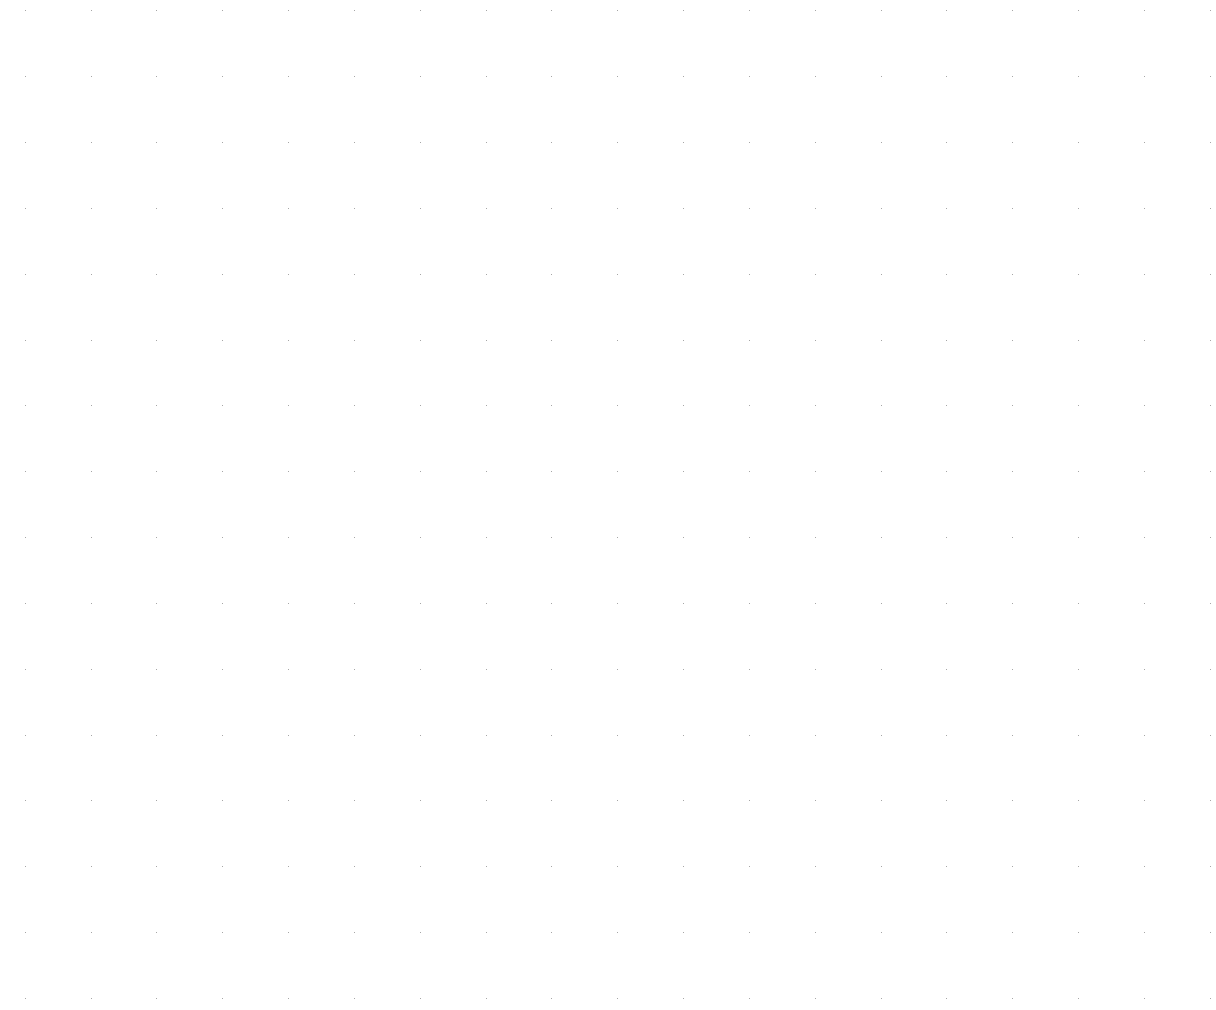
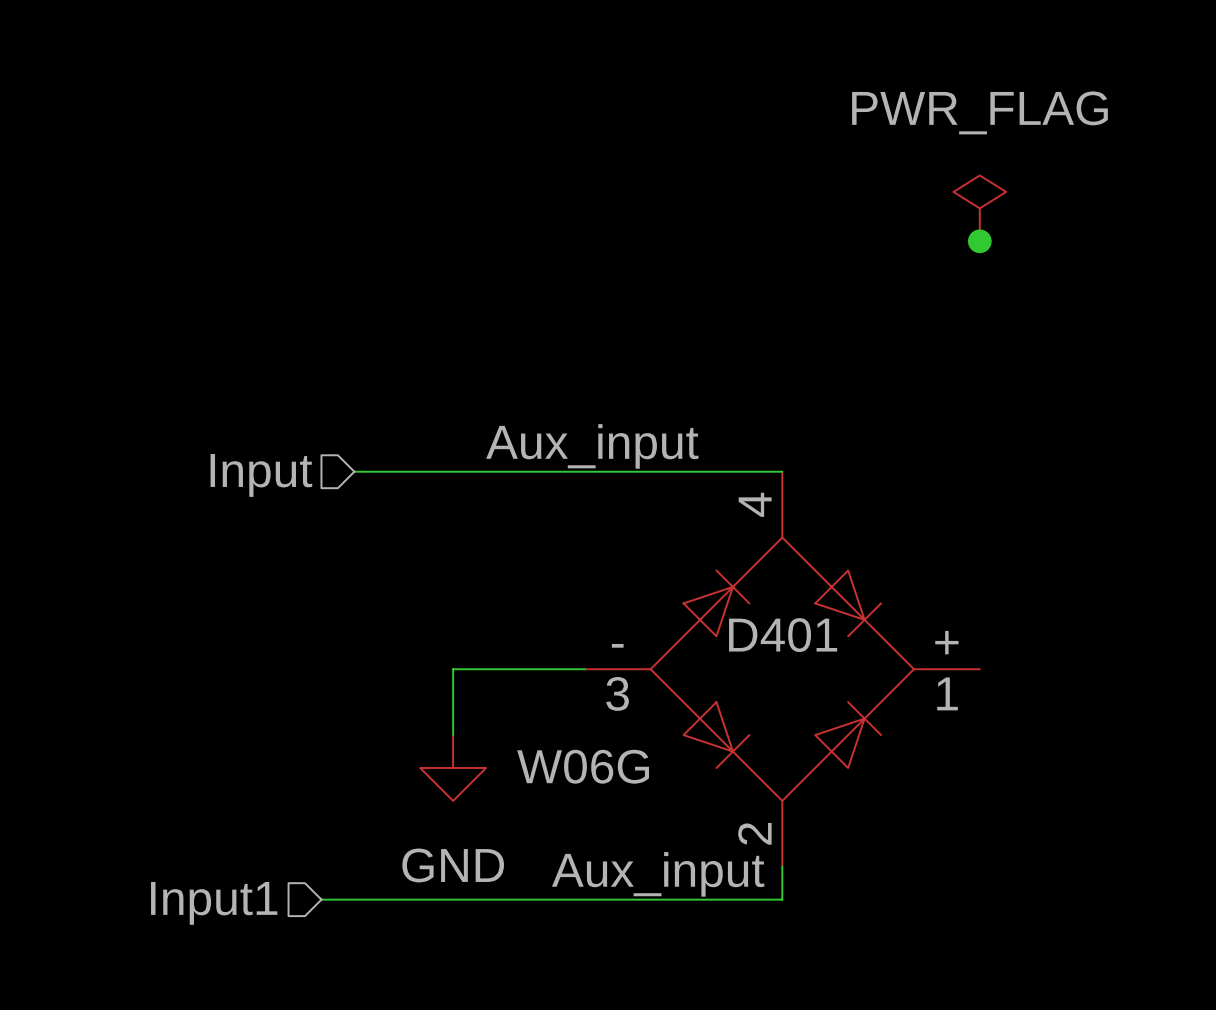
power symbol: none -> PWR_FLAG (979, 208)
junction: none -> (979, 241)
label: none -> Aux_input (592, 446)
wire: none -> (354, 471) (782, 471)
hierarchical label: none -> Input (261, 475)
wire: none -> (584, 669) (453, 669) (453, 735)
D401: none -> W06G (782, 669)
power symbol: none -> GND (453, 767)
wire: none -> (782, 866) (782, 899) (321, 899)
label: none -> Aux_input (658, 874)
hierarchical label: none -> Input1 (214, 903)

